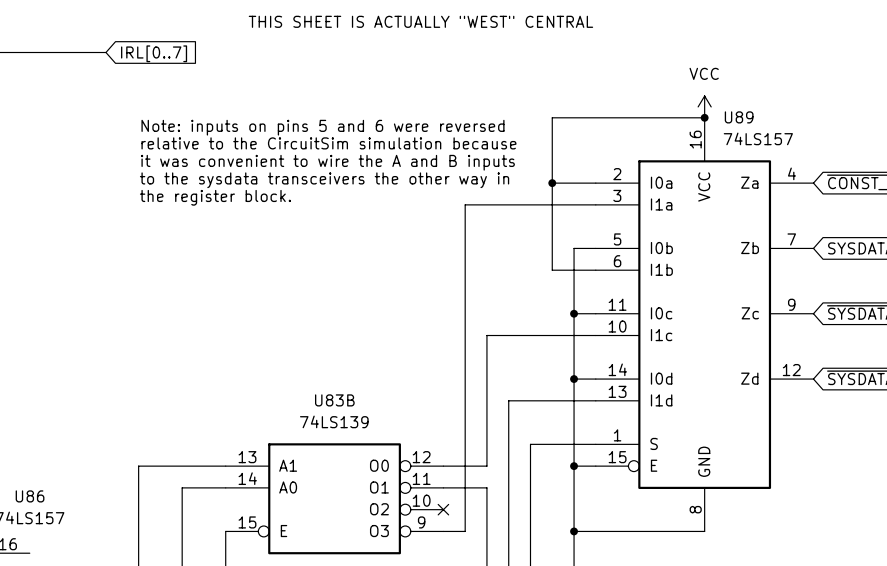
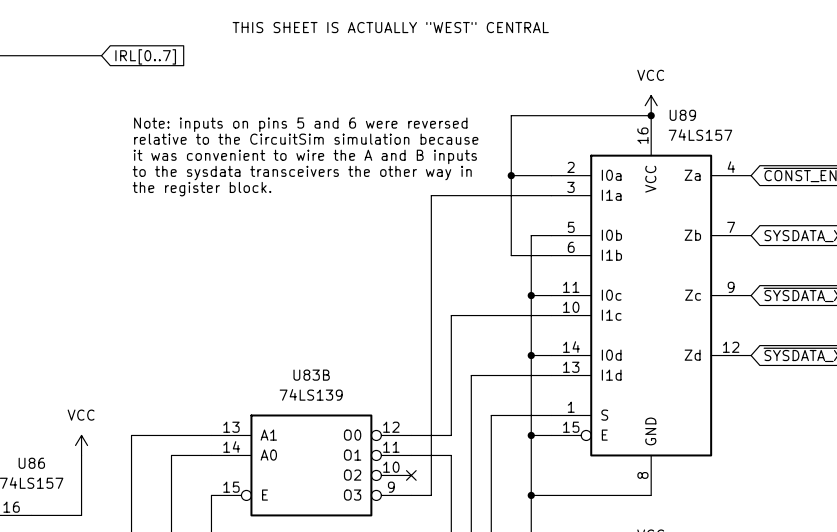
power symbol: none -> VCC (81, 445)
wire: none -> (81, 455) (81, 515) (31, 515)

